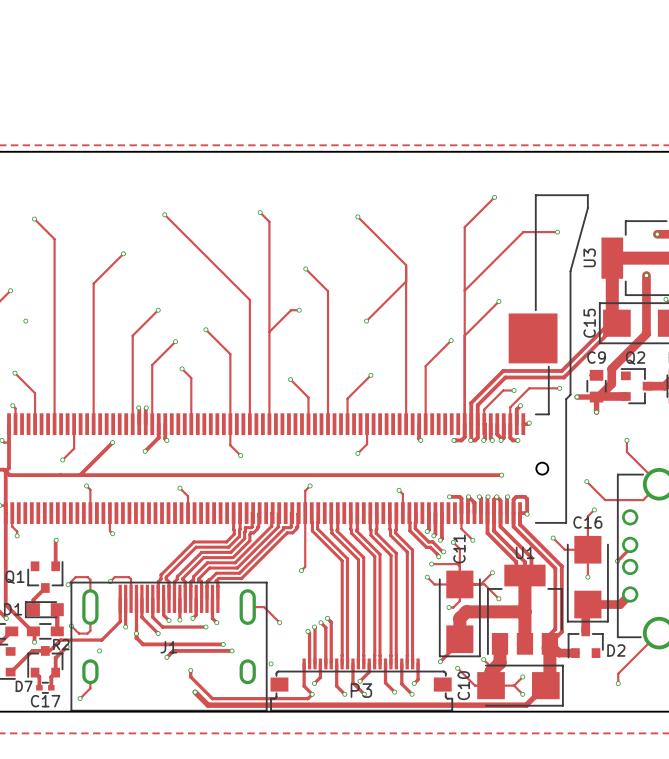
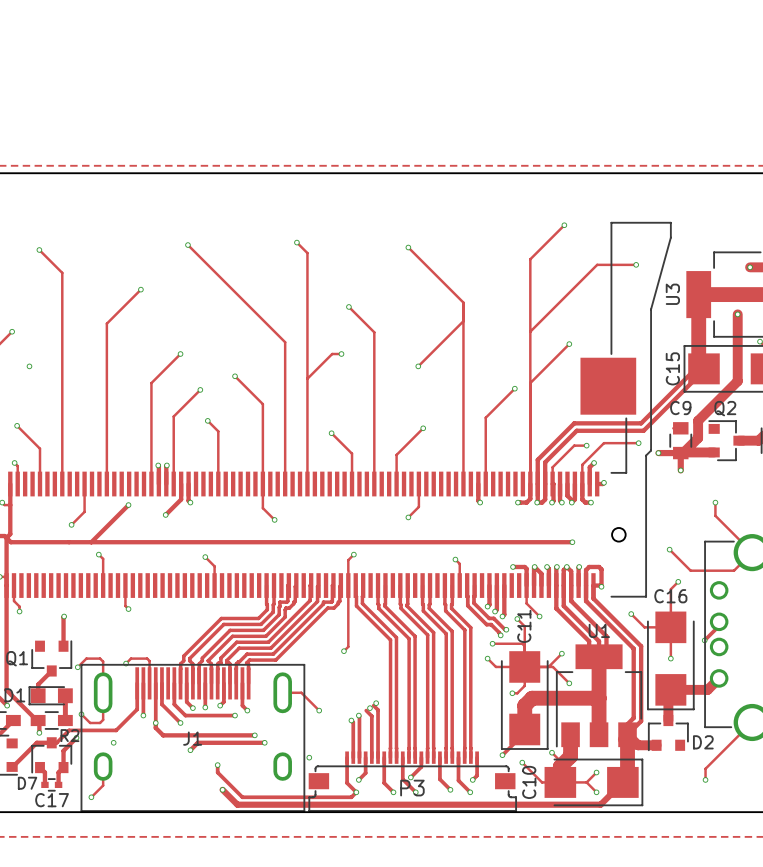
via: none -> (376, 703)
via: (327, 618) -> none
via: none -> (369, 708)
via: (320, 622) -> none

